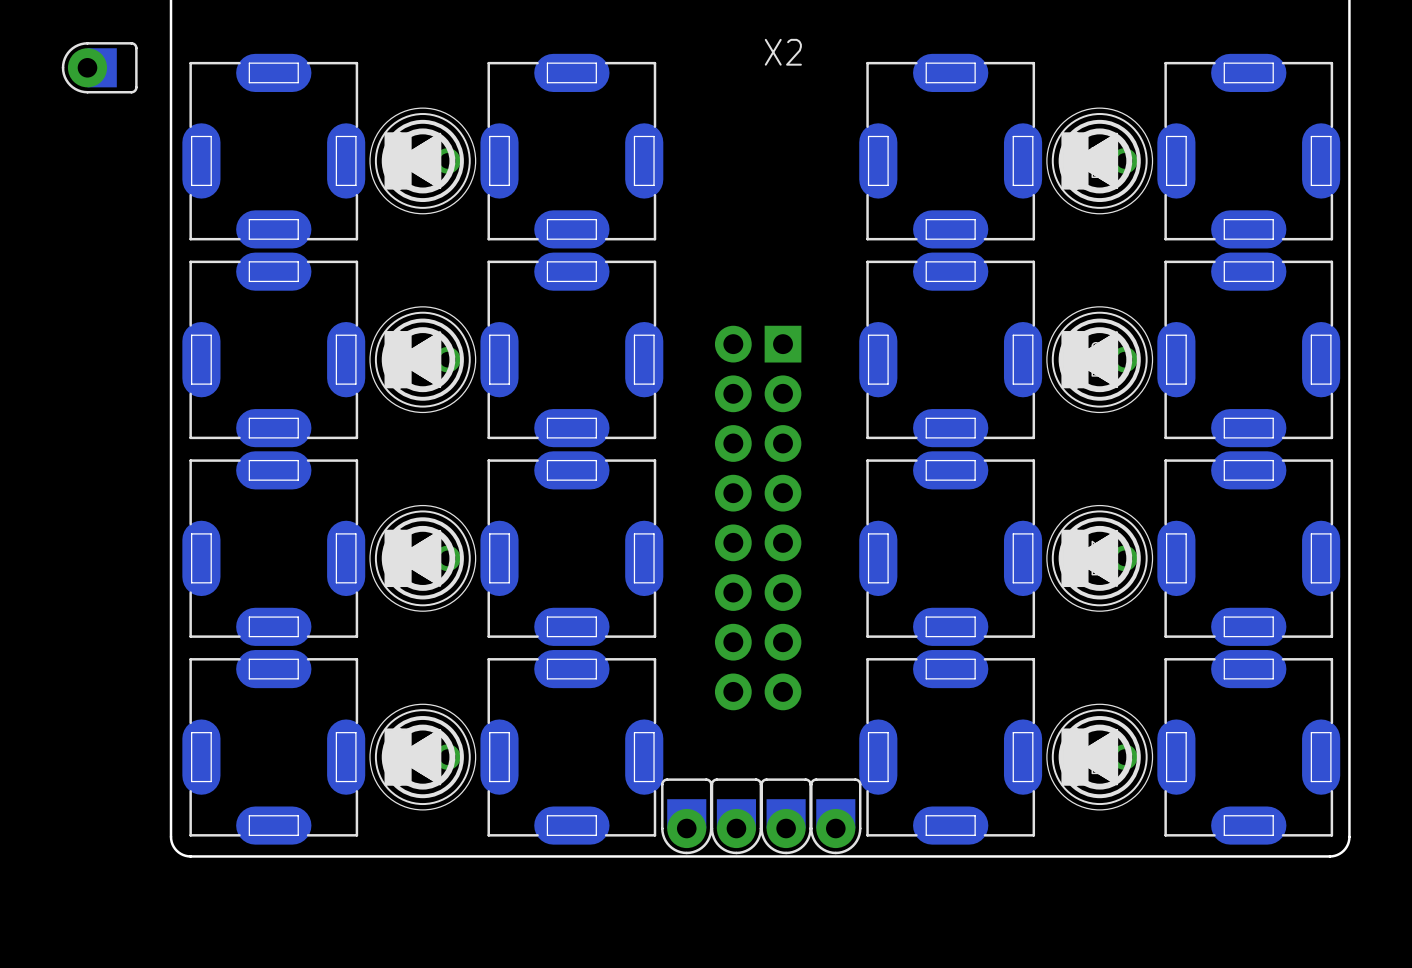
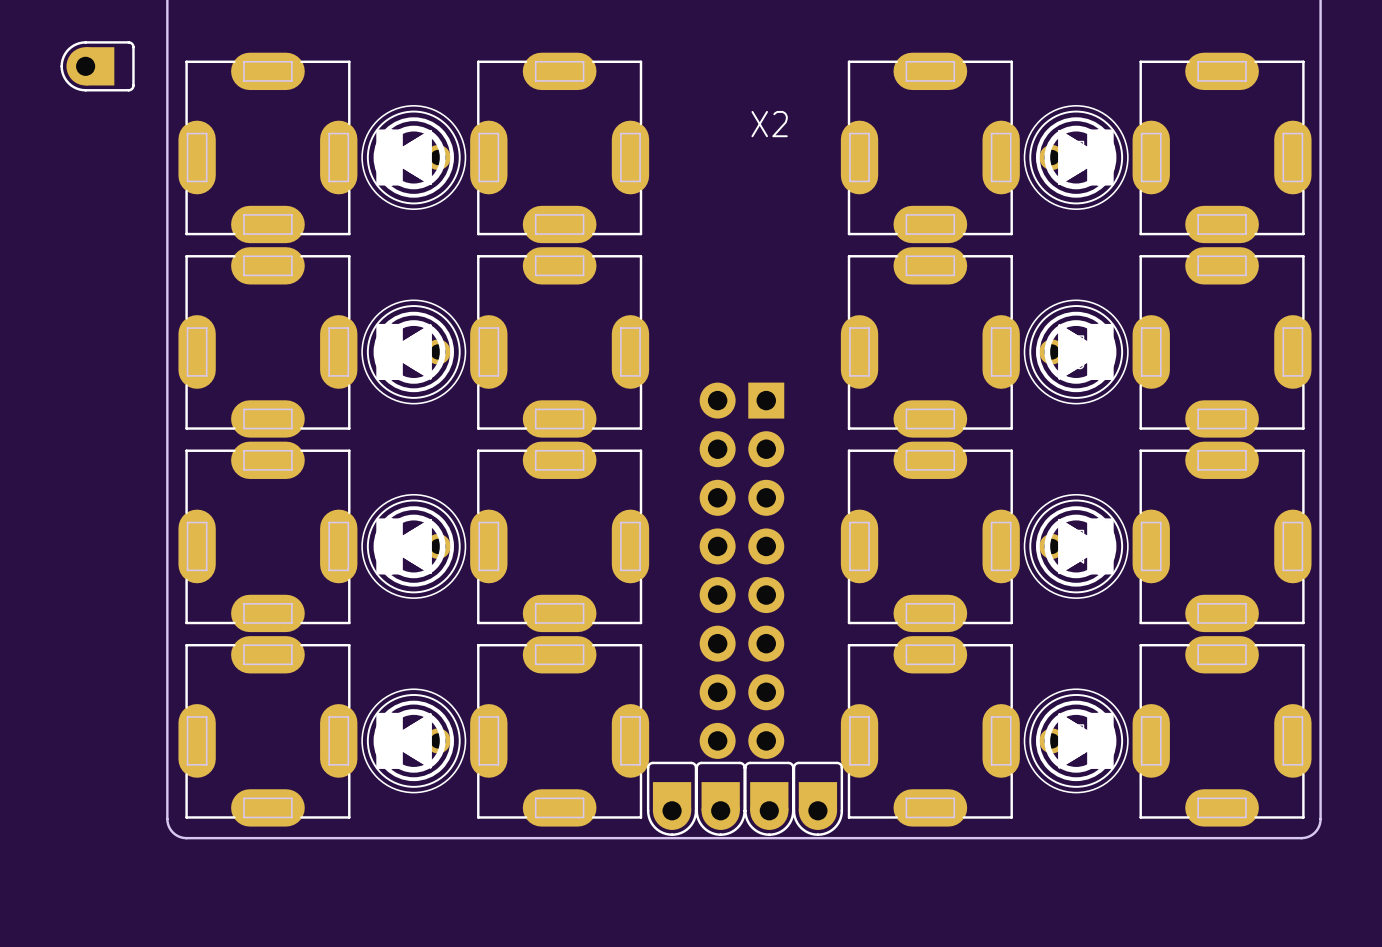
X2 name position: X2 (783, 52) -> X2 (769, 124)
part rotation: 0° (1099, 160) -> 180° (1076, 157)
part rotation: 0° (1099, 359) -> 180° (1076, 351)
part position: (758, 518) -> (741, 570)
part rotation: 0° (1099, 558) -> 180° (1076, 546)
part rotation: 0° (1099, 757) -> 180° (1076, 740)

